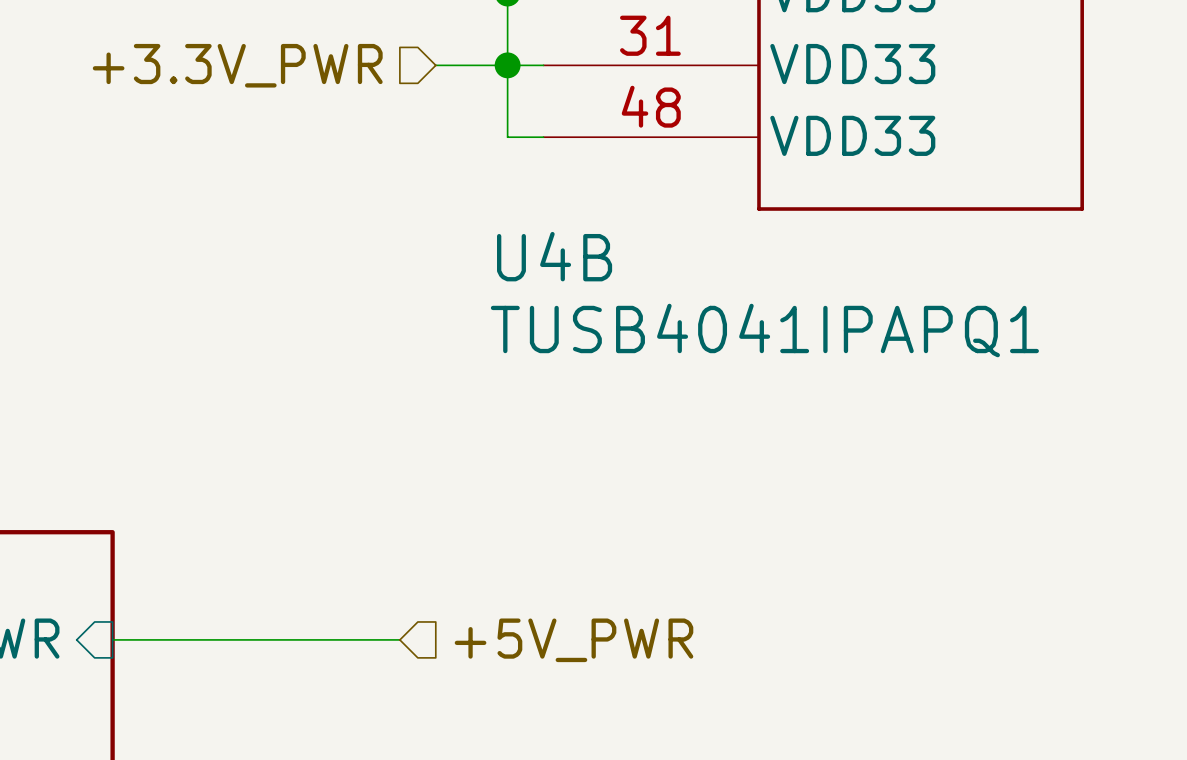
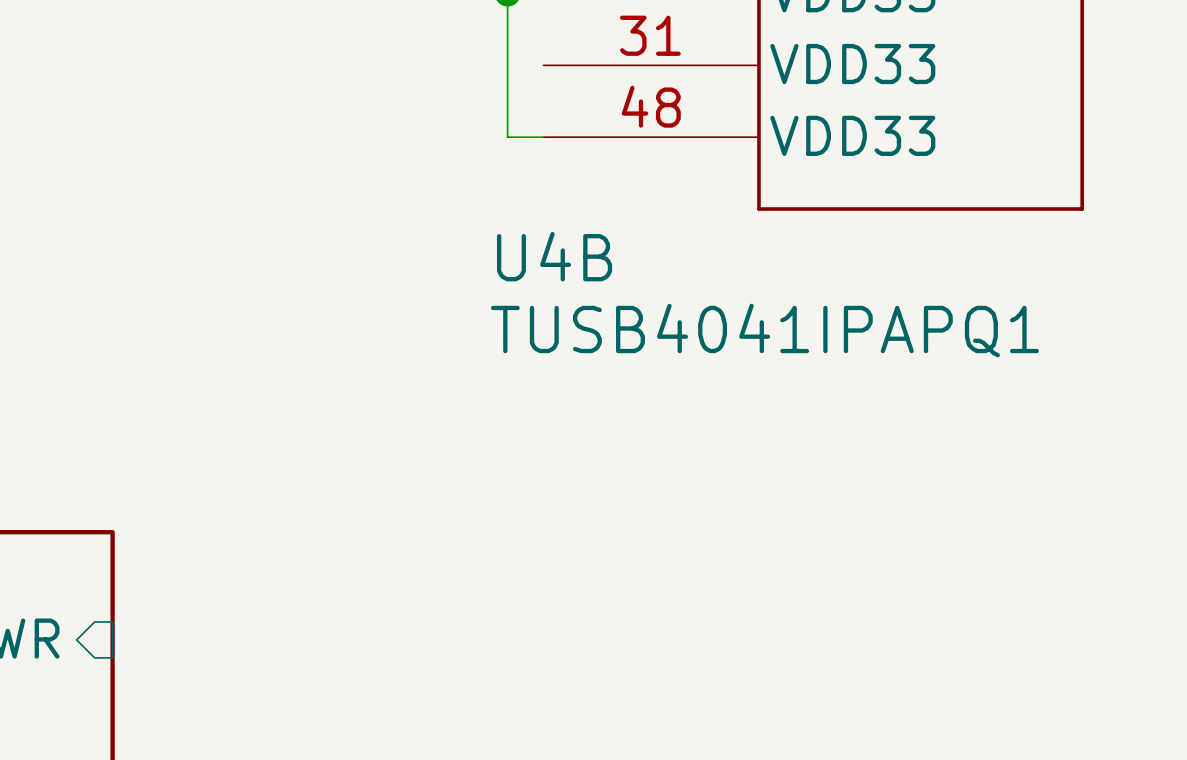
hierarchical label: +3.3V_PWR (237, 65) -> none
wire: (435, 65) (543, 65) -> none
junction: (507, 65) -> none
wire: (112, 639) (399, 639) -> none
hierarchical label: +5V_PWR (574, 640) -> none

